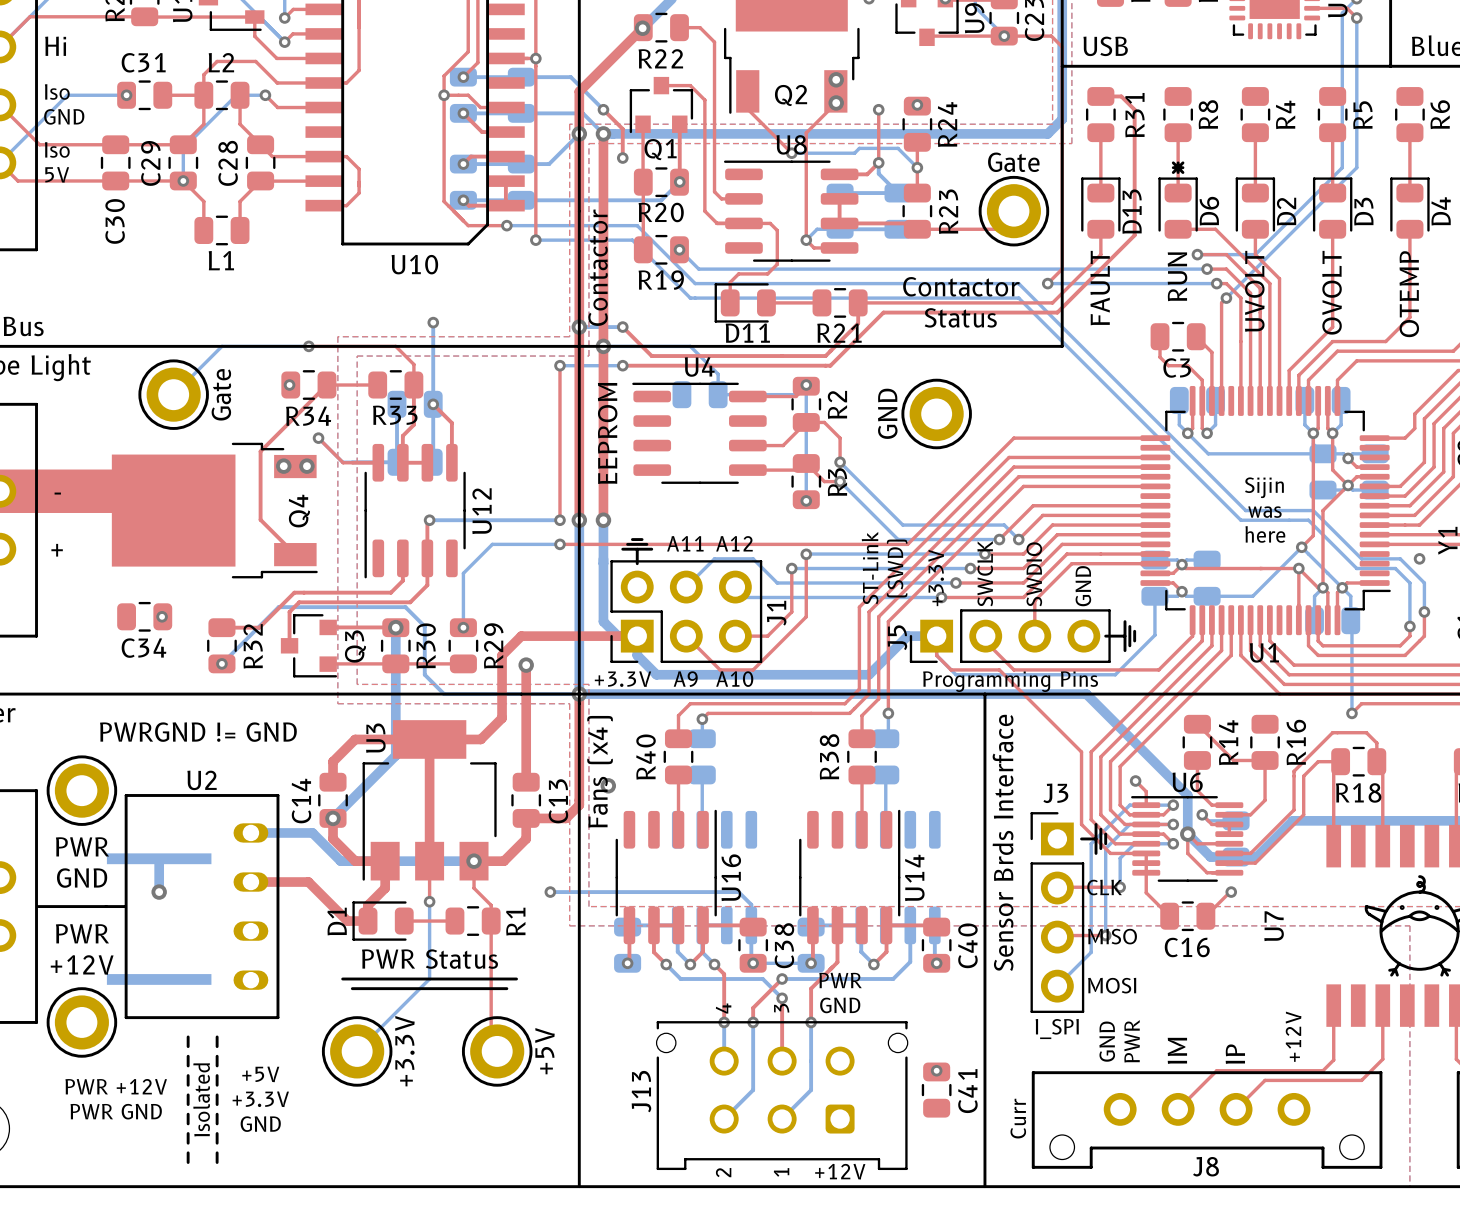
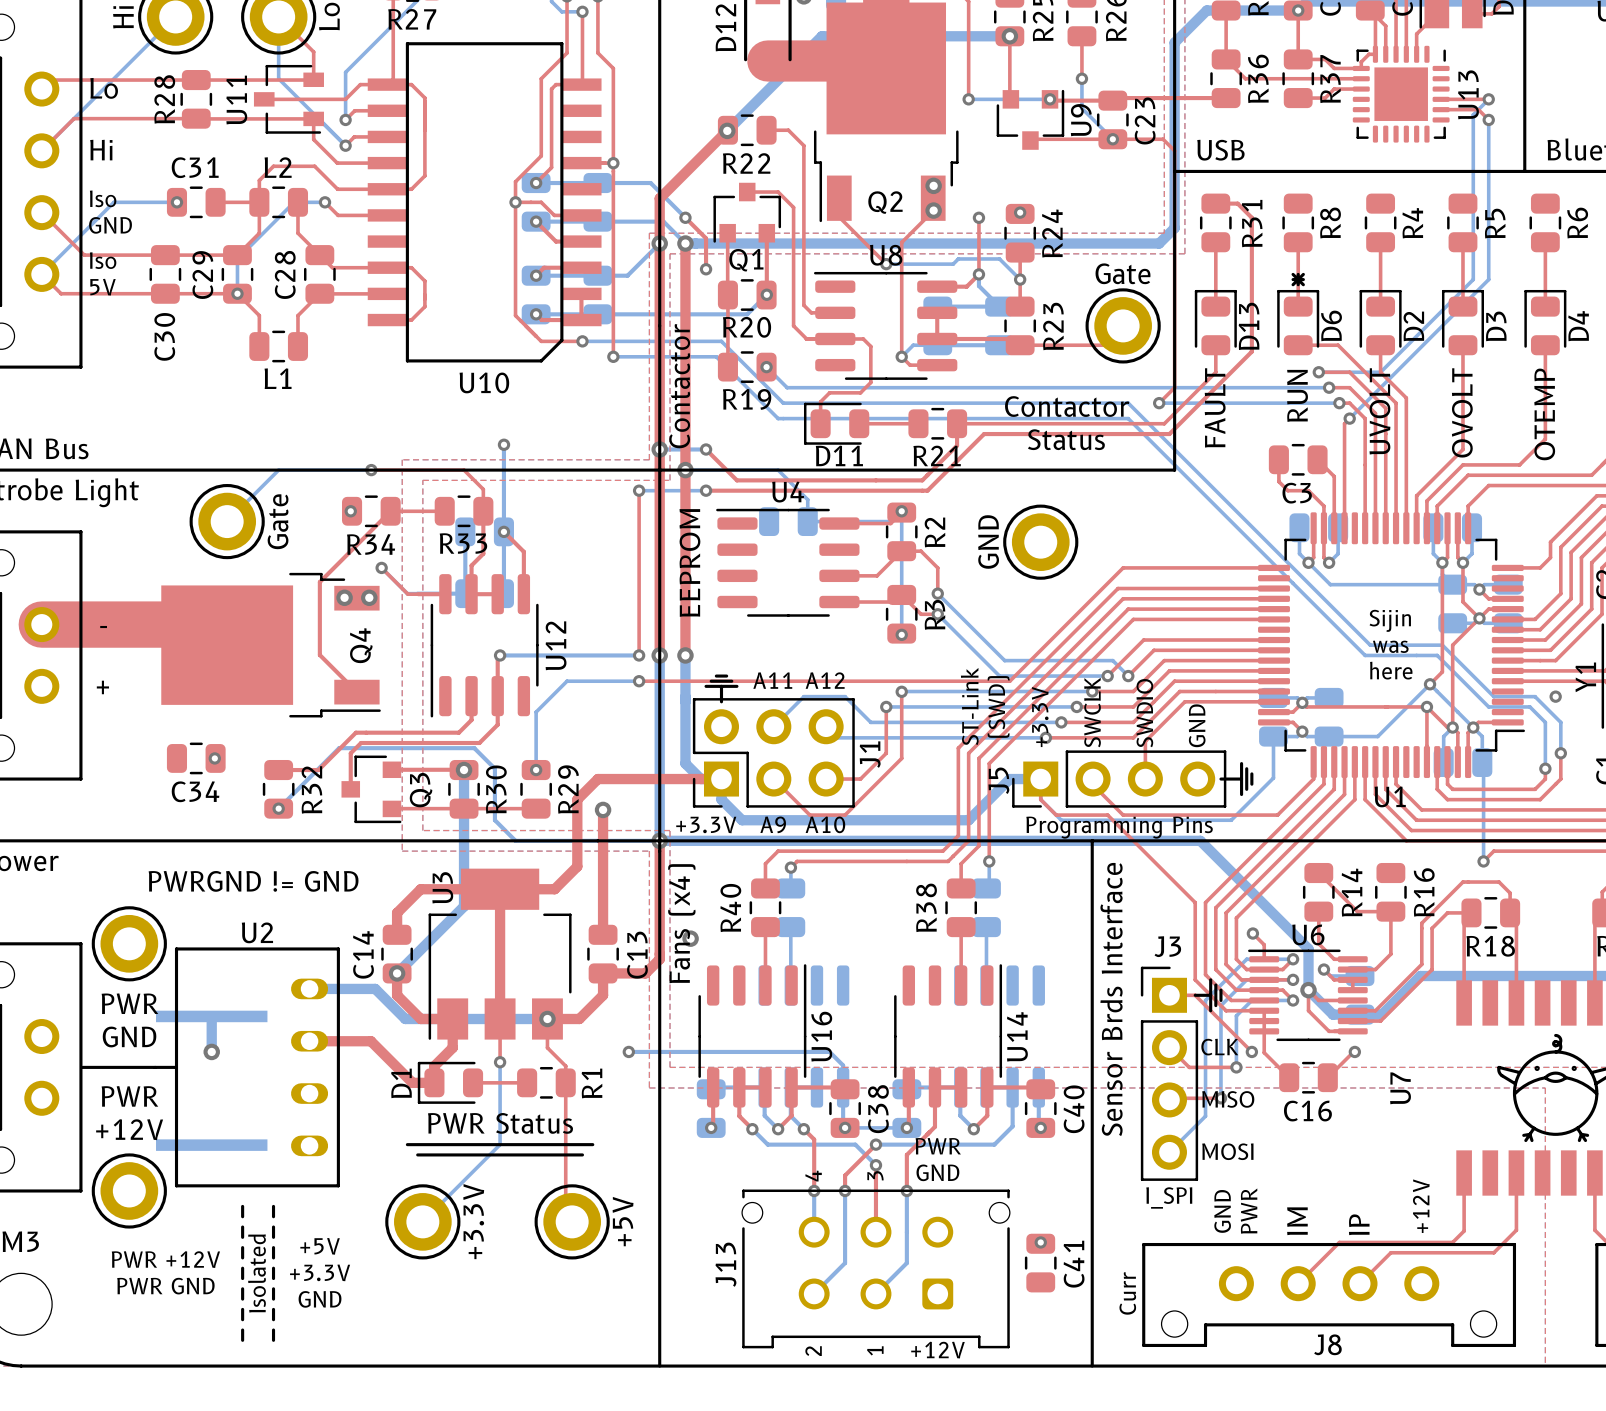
top track: none -> (1169, 995) (1195, 995) (1251, 1051)
top track: (1058, 887) (1120, 887) -> none
bottom track: none -> (1236, 1046) (1236, 1067)
via: (1120, 887) -> none
top track: none -> (1169, 1047) (1189, 1067) (1236, 1067)
via: none -> (1251, 1051)
via: none -> (1236, 1067)

